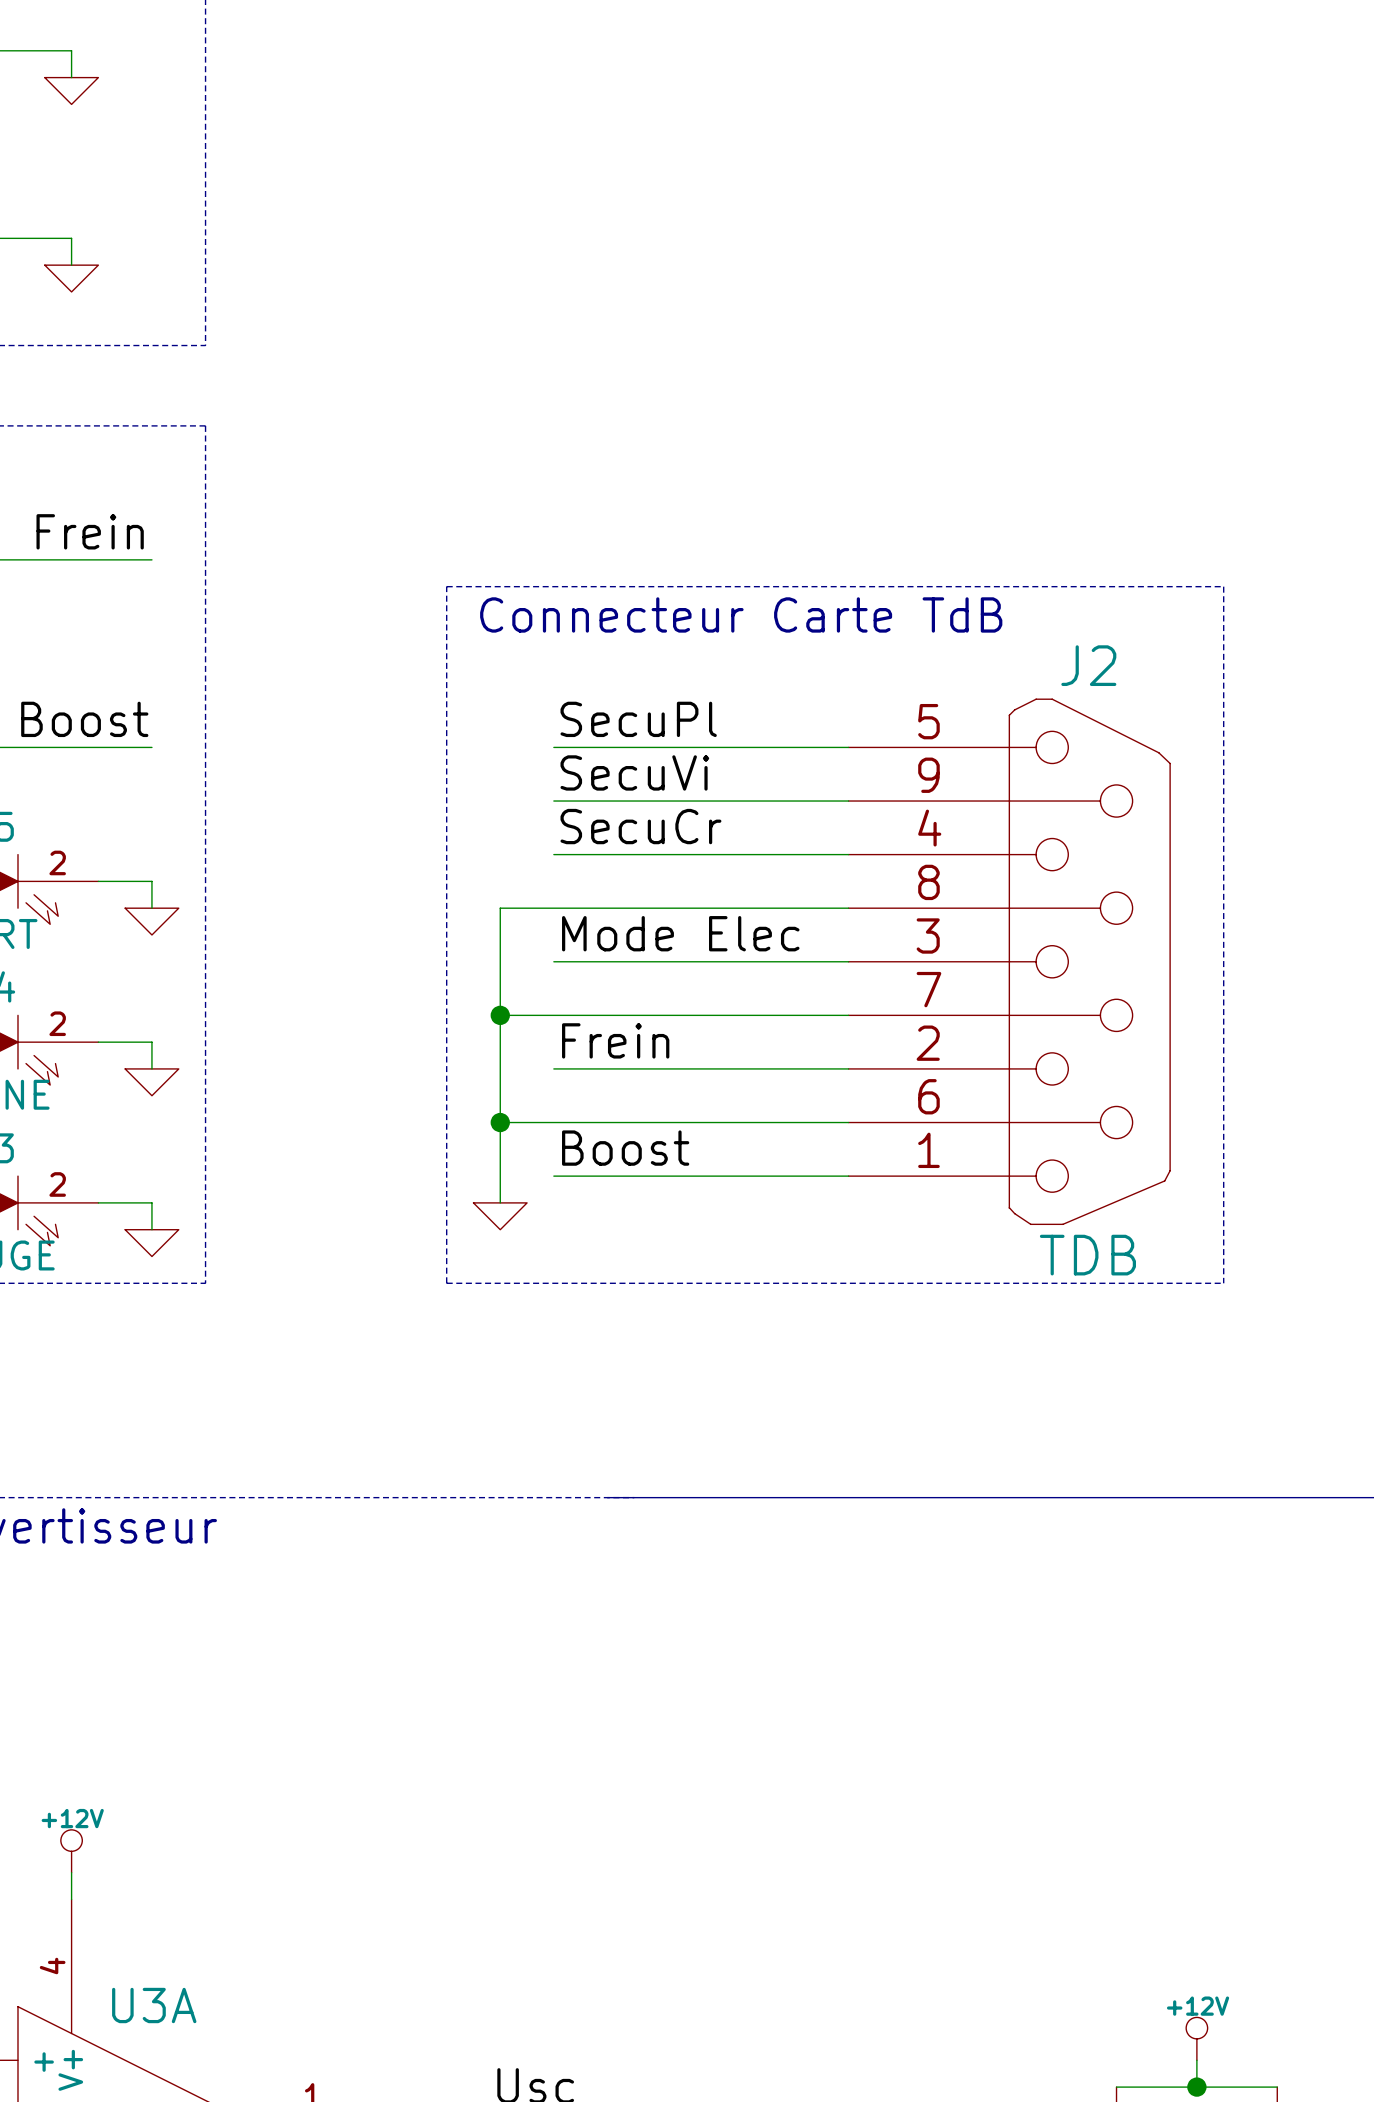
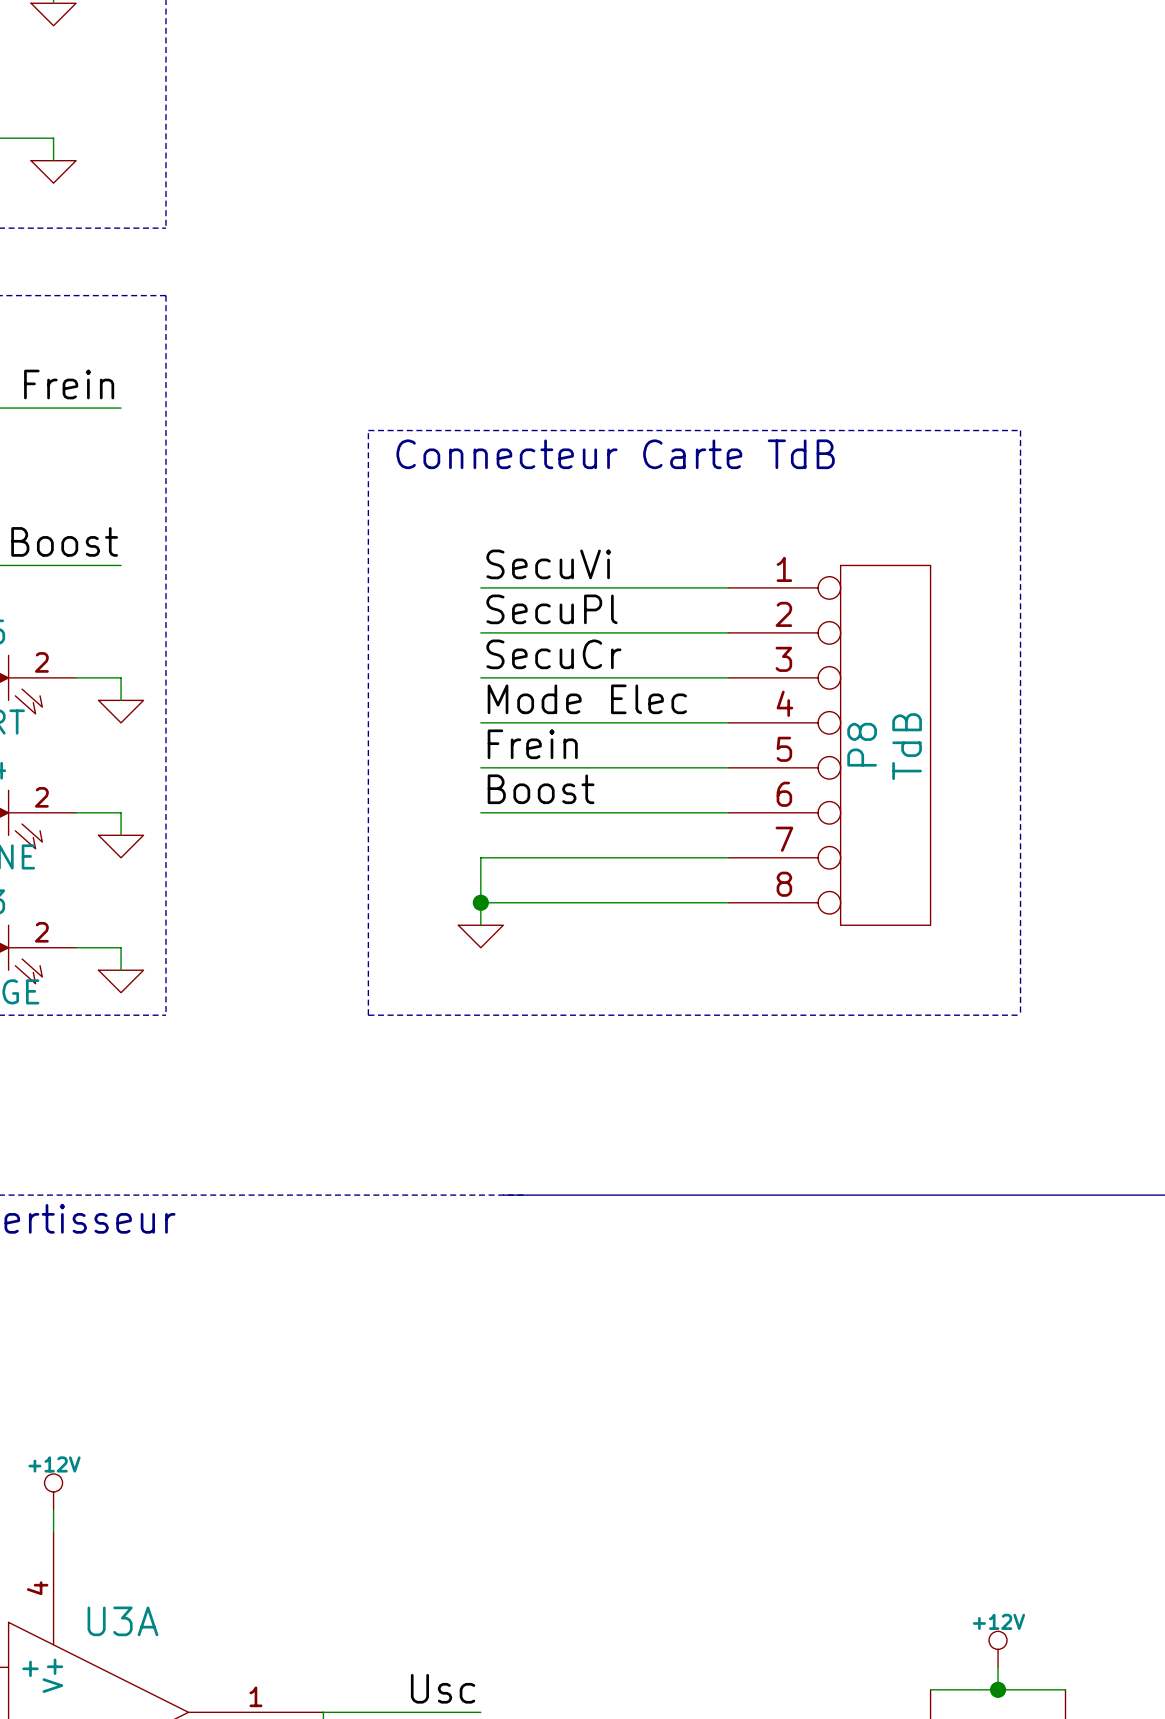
label position: SecuPl (638, 719) -> SecuPl (551, 609)
wire: (553, 747) (848, 747) -> (480, 677) (728, 677)
label position: SecuVi (634, 772) -> SecuVi (548, 564)
wire: (553, 801) (848, 801) -> (480, 587) (728, 587)
label position: SecuCr (640, 826) -> SecuCr (553, 654)
wire: (553, 854) (848, 854) -> (480, 632) (728, 632)
wire: (848, 908) (500, 908) (500, 1202) -> none
label position: Mode Elec (680, 933) -> Mode Elec (587, 699)
wire: (553, 961) (848, 961) -> (480, 722) (728, 722)
P8: none -> TdB (829, 745)
J2: TDB (1009, 961) -> none
wire: none -> (480, 767) (728, 767)
wire: (500, 1015) (848, 1015) -> none
junction: (500, 1015) -> none
label position: Frein (615, 1040) -> Frein (532, 744)
wire: (553, 1068) (848, 1068) -> (480, 812) (728, 812)
wire: none -> (728, 857) (480, 857) (480, 925)
wire: (500, 1122) (848, 1122) -> none
junction: (500, 1122) -> none
label position: Boost (625, 1148) -> Boost (541, 789)
junction: none -> (480, 902)
wire: (553, 1176) (848, 1176) -> (480, 902) (728, 902)
power symbol position: (500, 1216) -> (480, 936)

